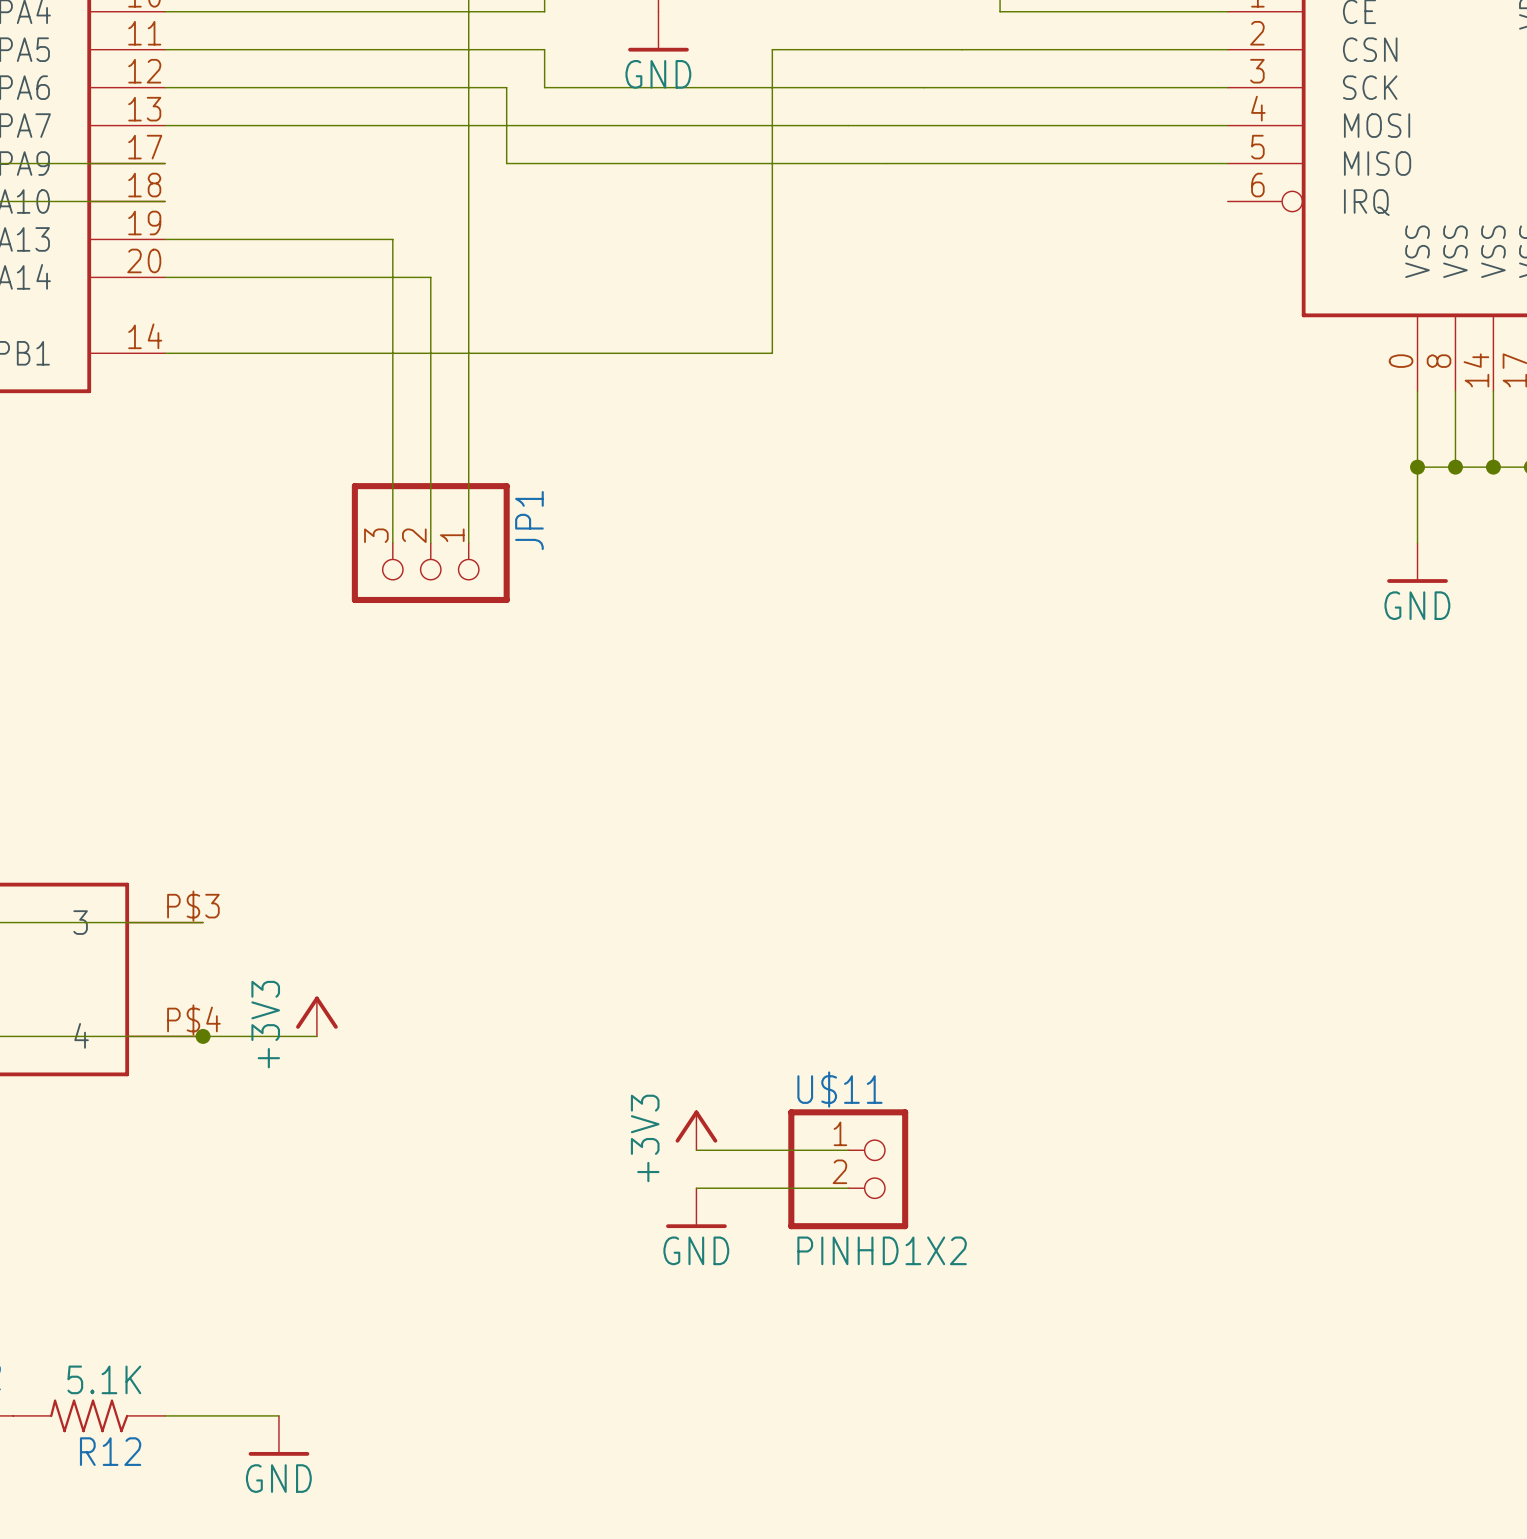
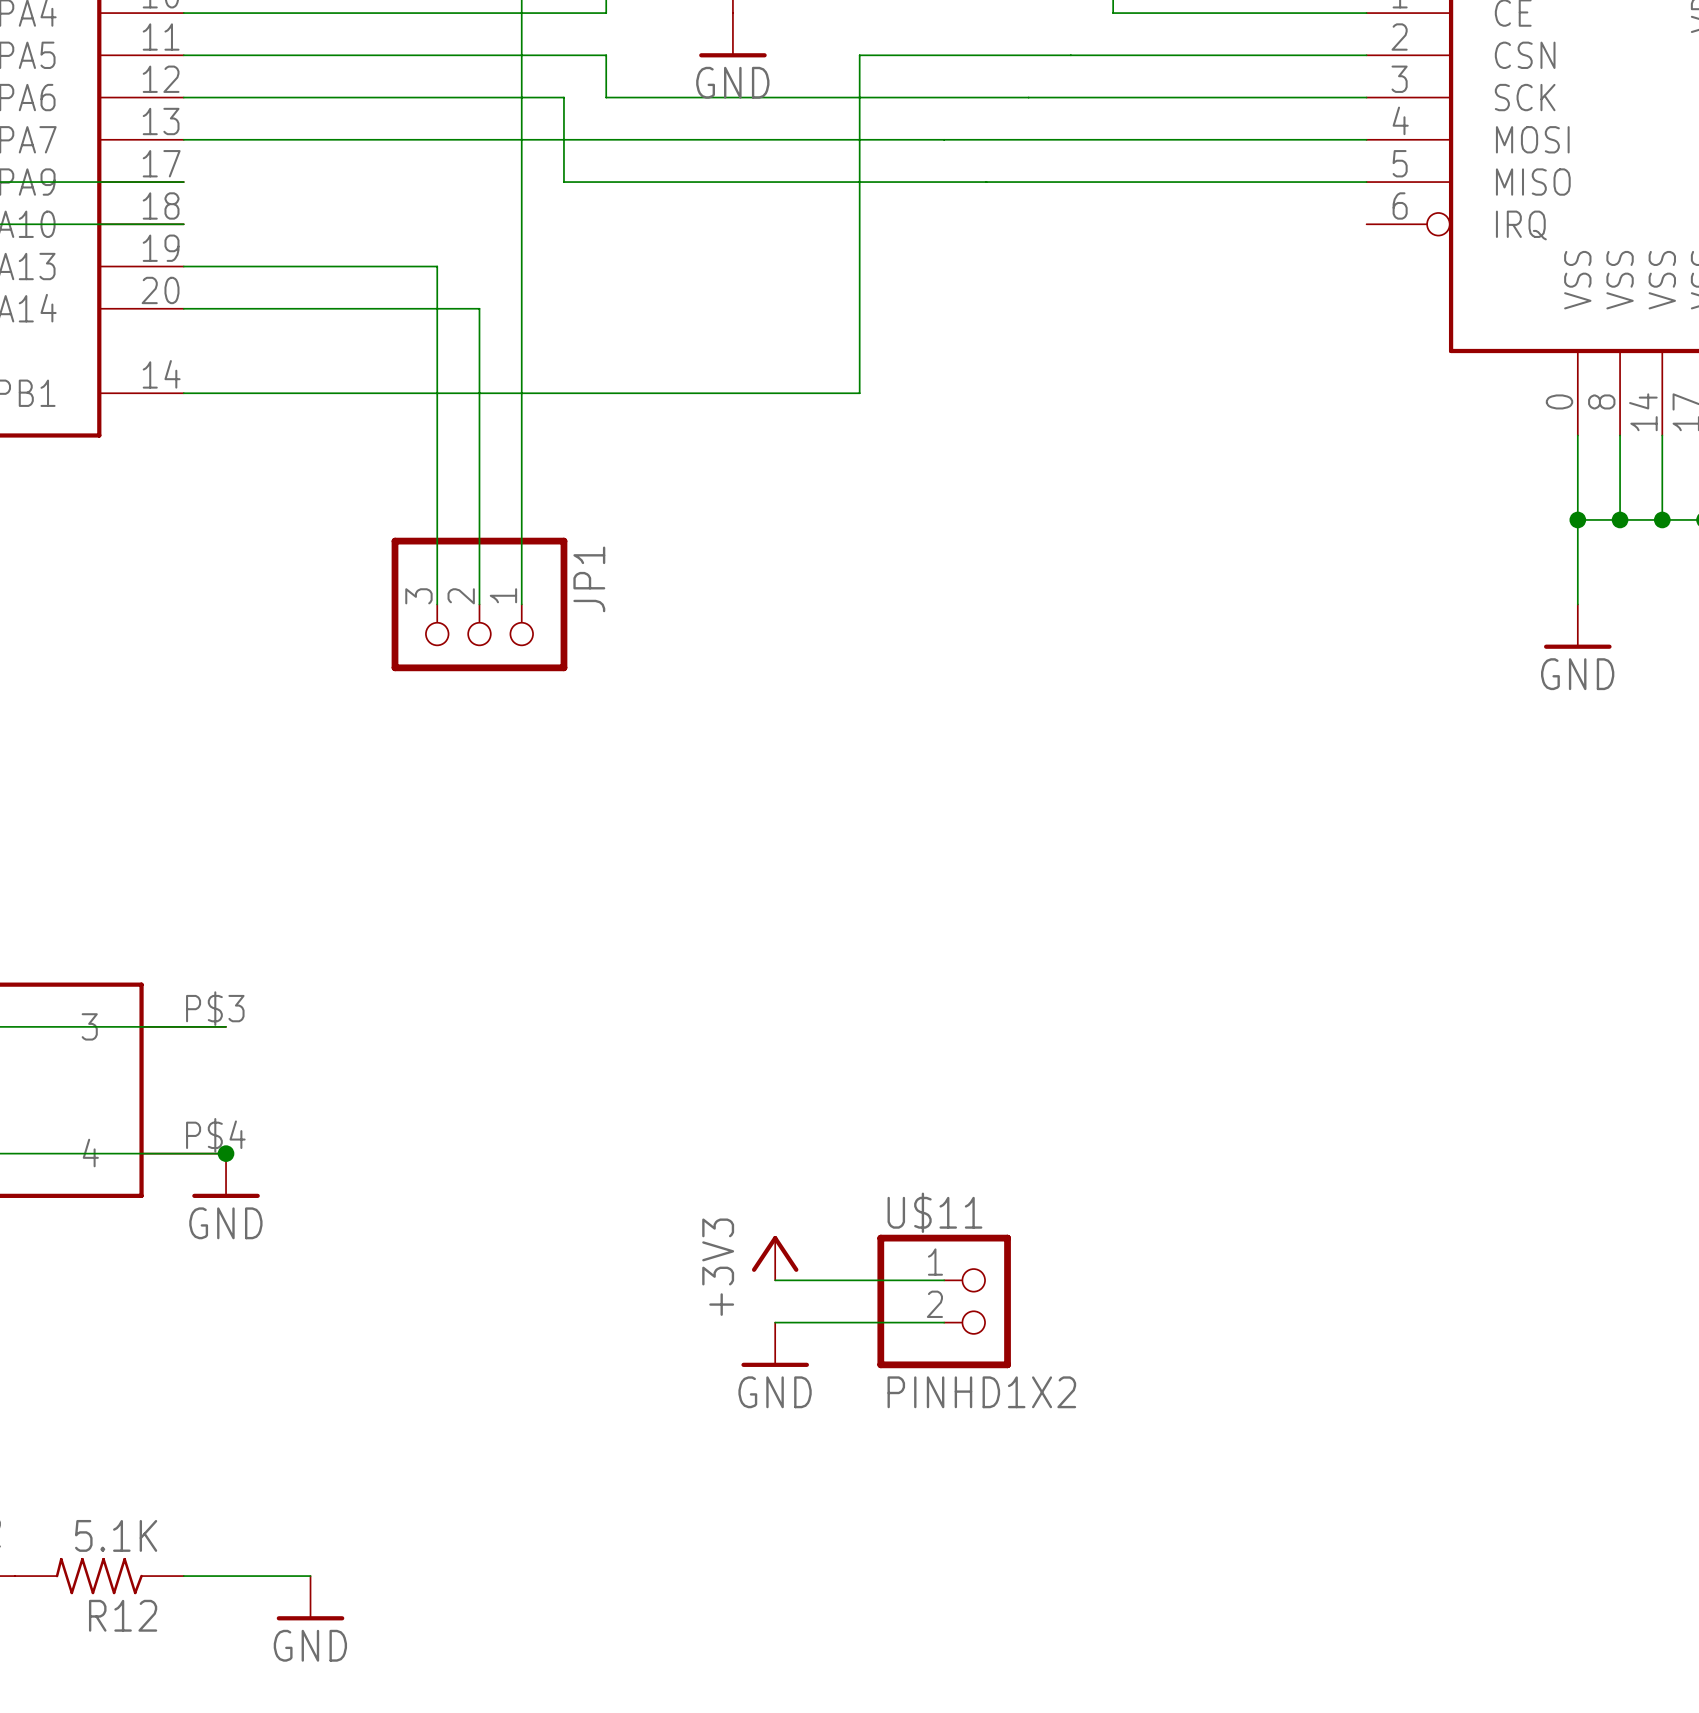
power symbol: +3V3 (316, 1016) -> none
wire: (203, 1036) (316, 1036) -> none
power symbol: none -> GND (226, 1175)

